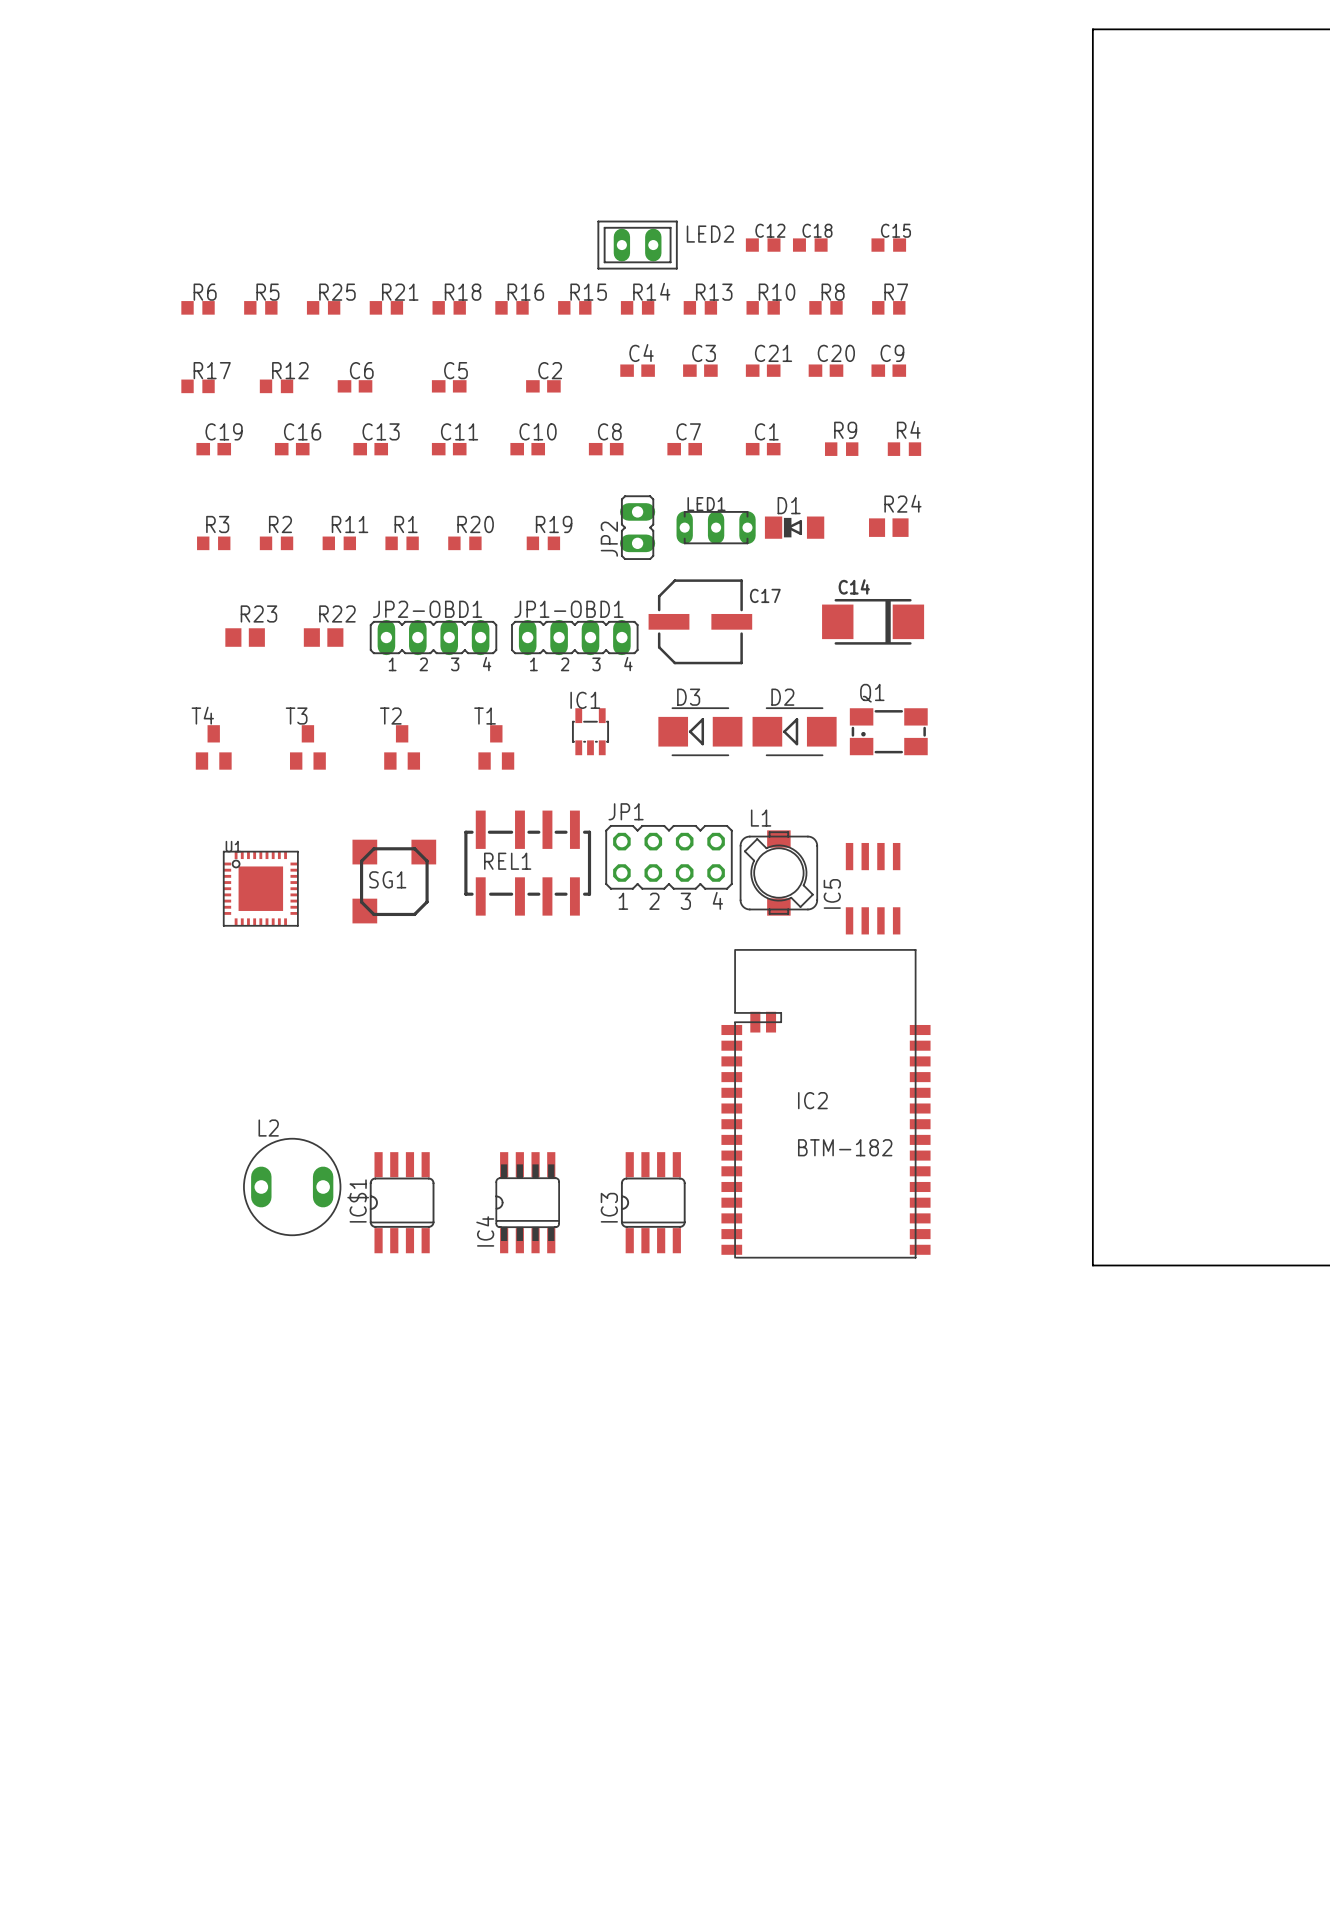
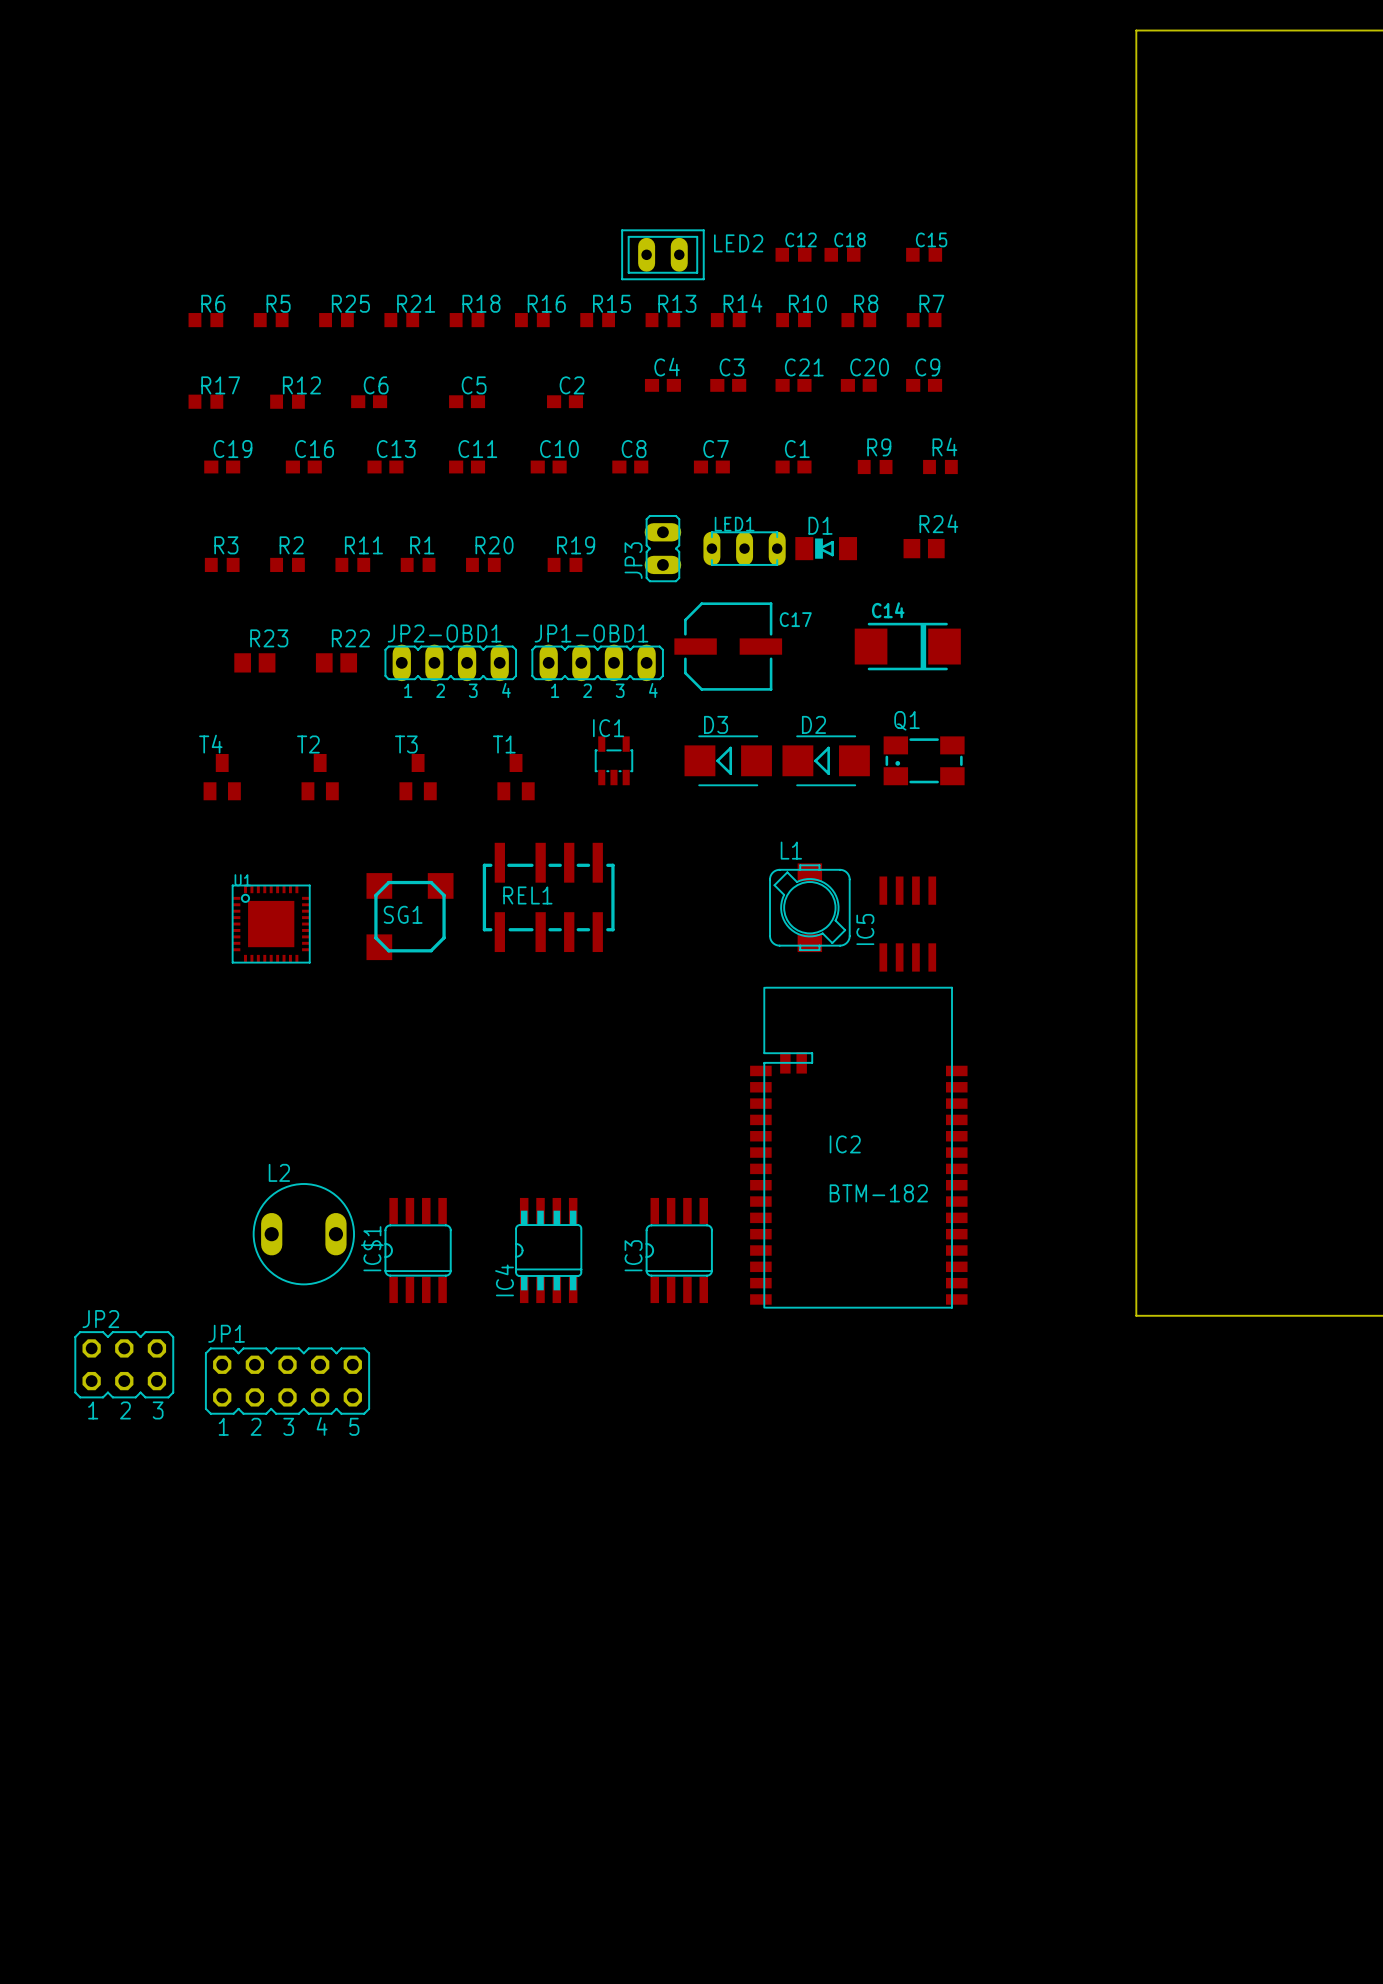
R14 name: R14 (651, 291) -> R13 (677, 303)
R13 name: R13 (714, 292) -> R14 (742, 303)
JP2 name: JP2 (609, 539) -> JP3 (633, 560)
T3 name: T3 (296, 716) -> T2 (308, 744)
T2 name: T2 (390, 716) -> T3 (406, 744)
JP1 footprint: [605, 824, 733, 890] -> [204, 1347, 371, 1415]
JP2: none -> (124, 1364)

